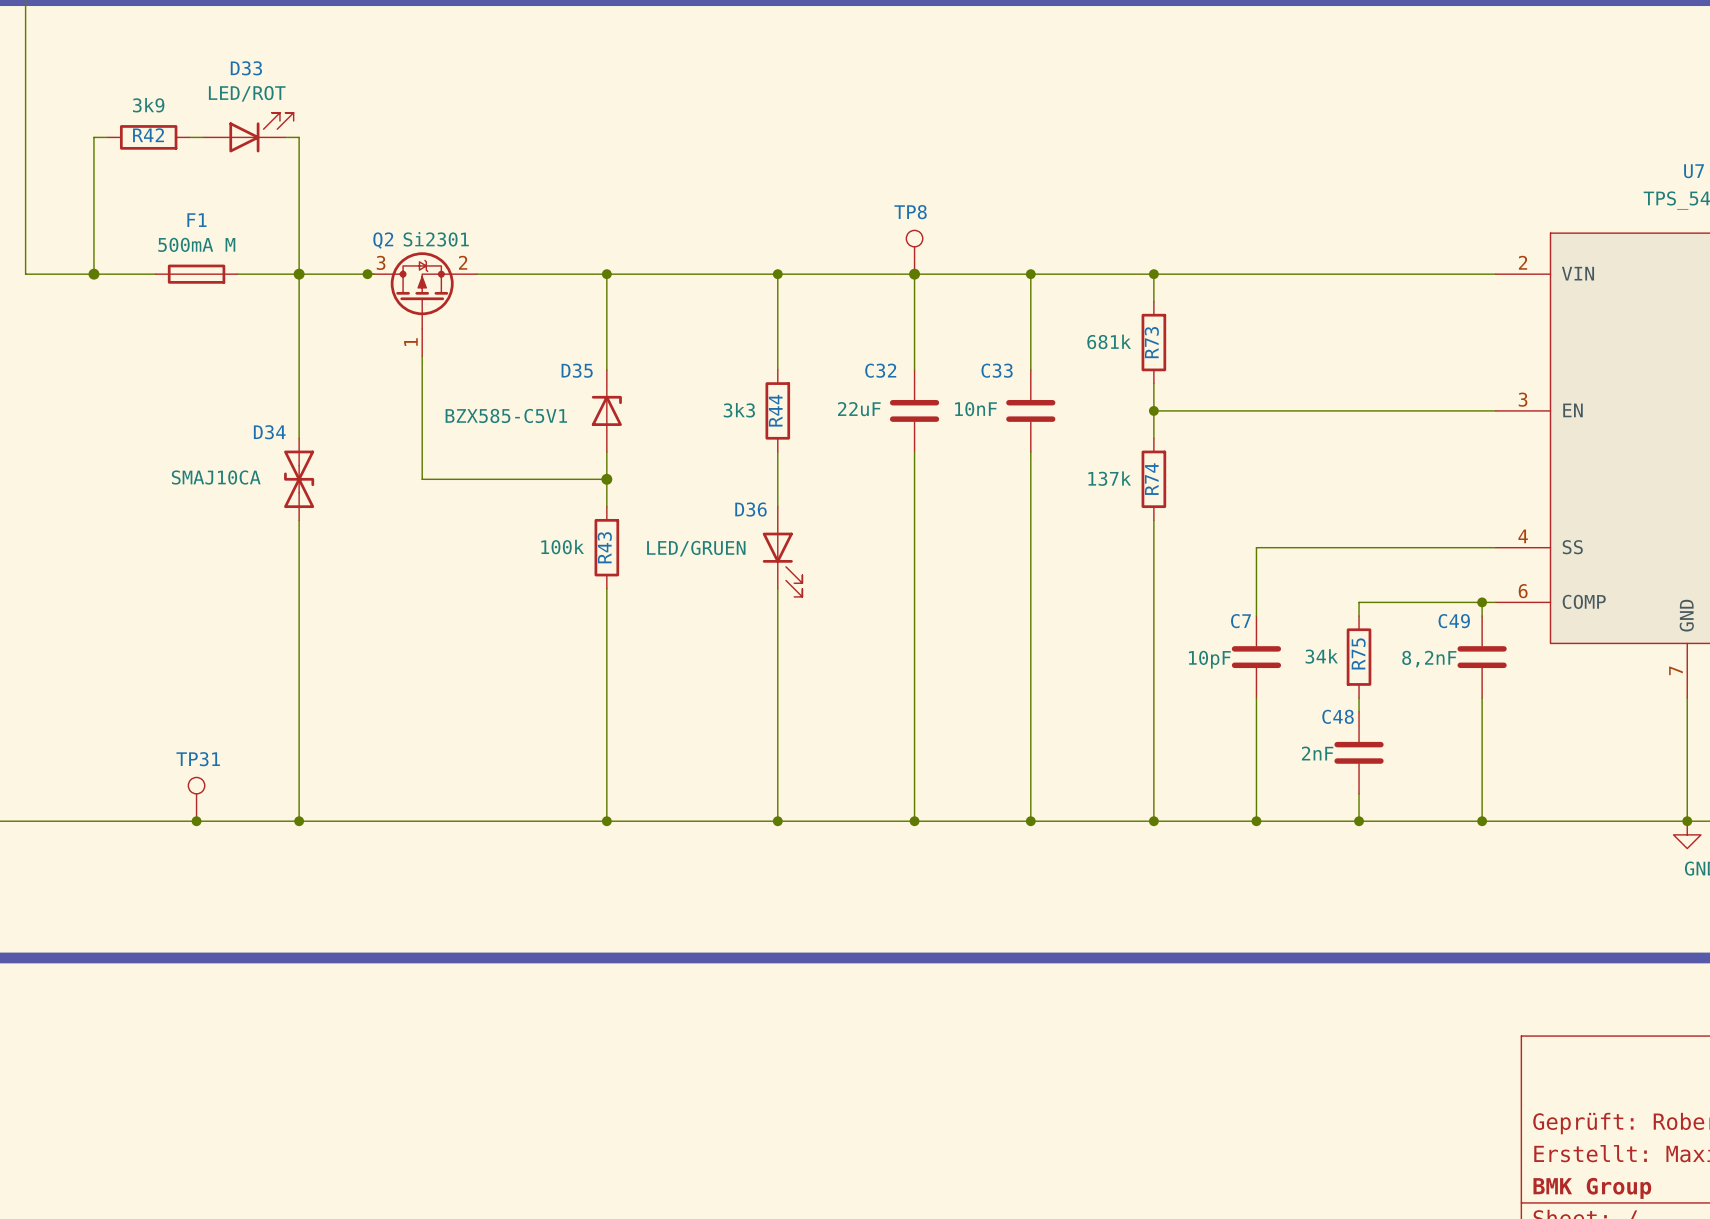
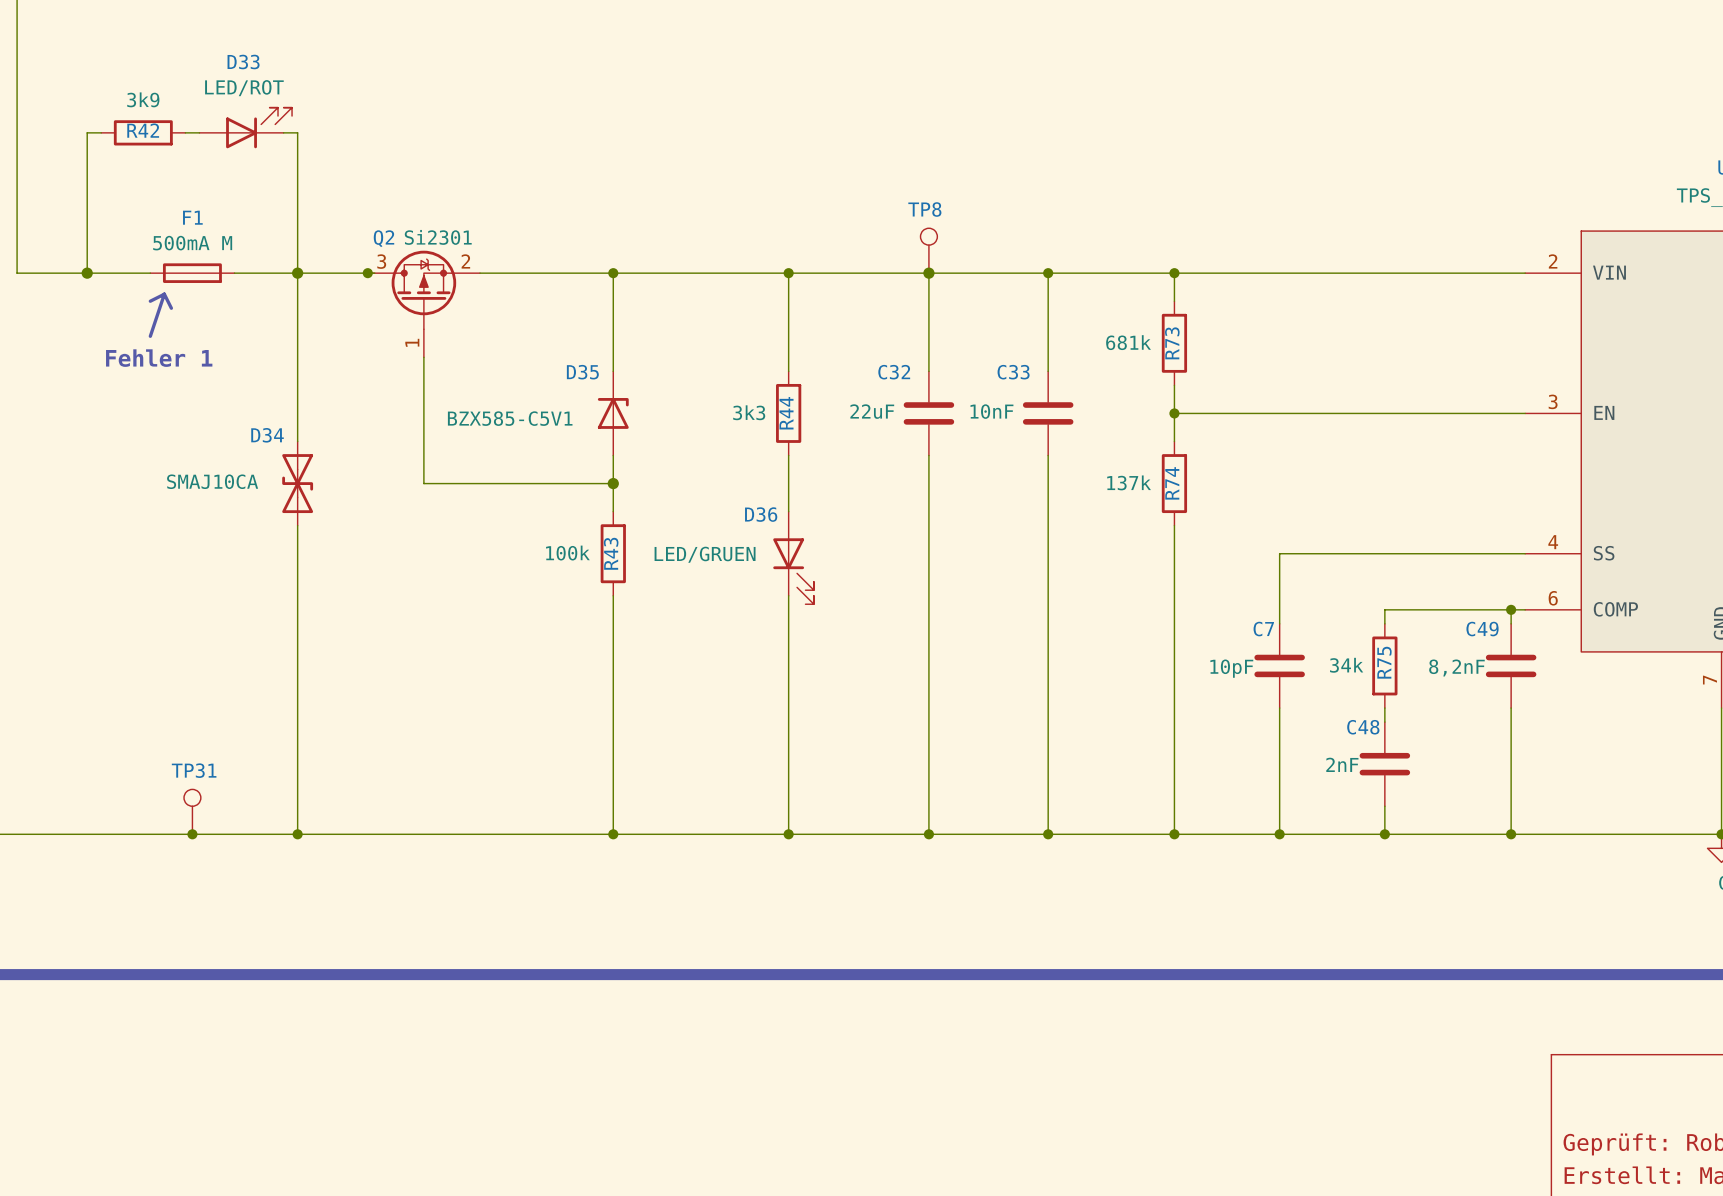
line: none -> (164, 294) (150, 301)
line: none -> (164, 294) (150, 336)
line: none -> (164, 294) (171, 308)
text: none -> Fehler 1 (159, 358)

